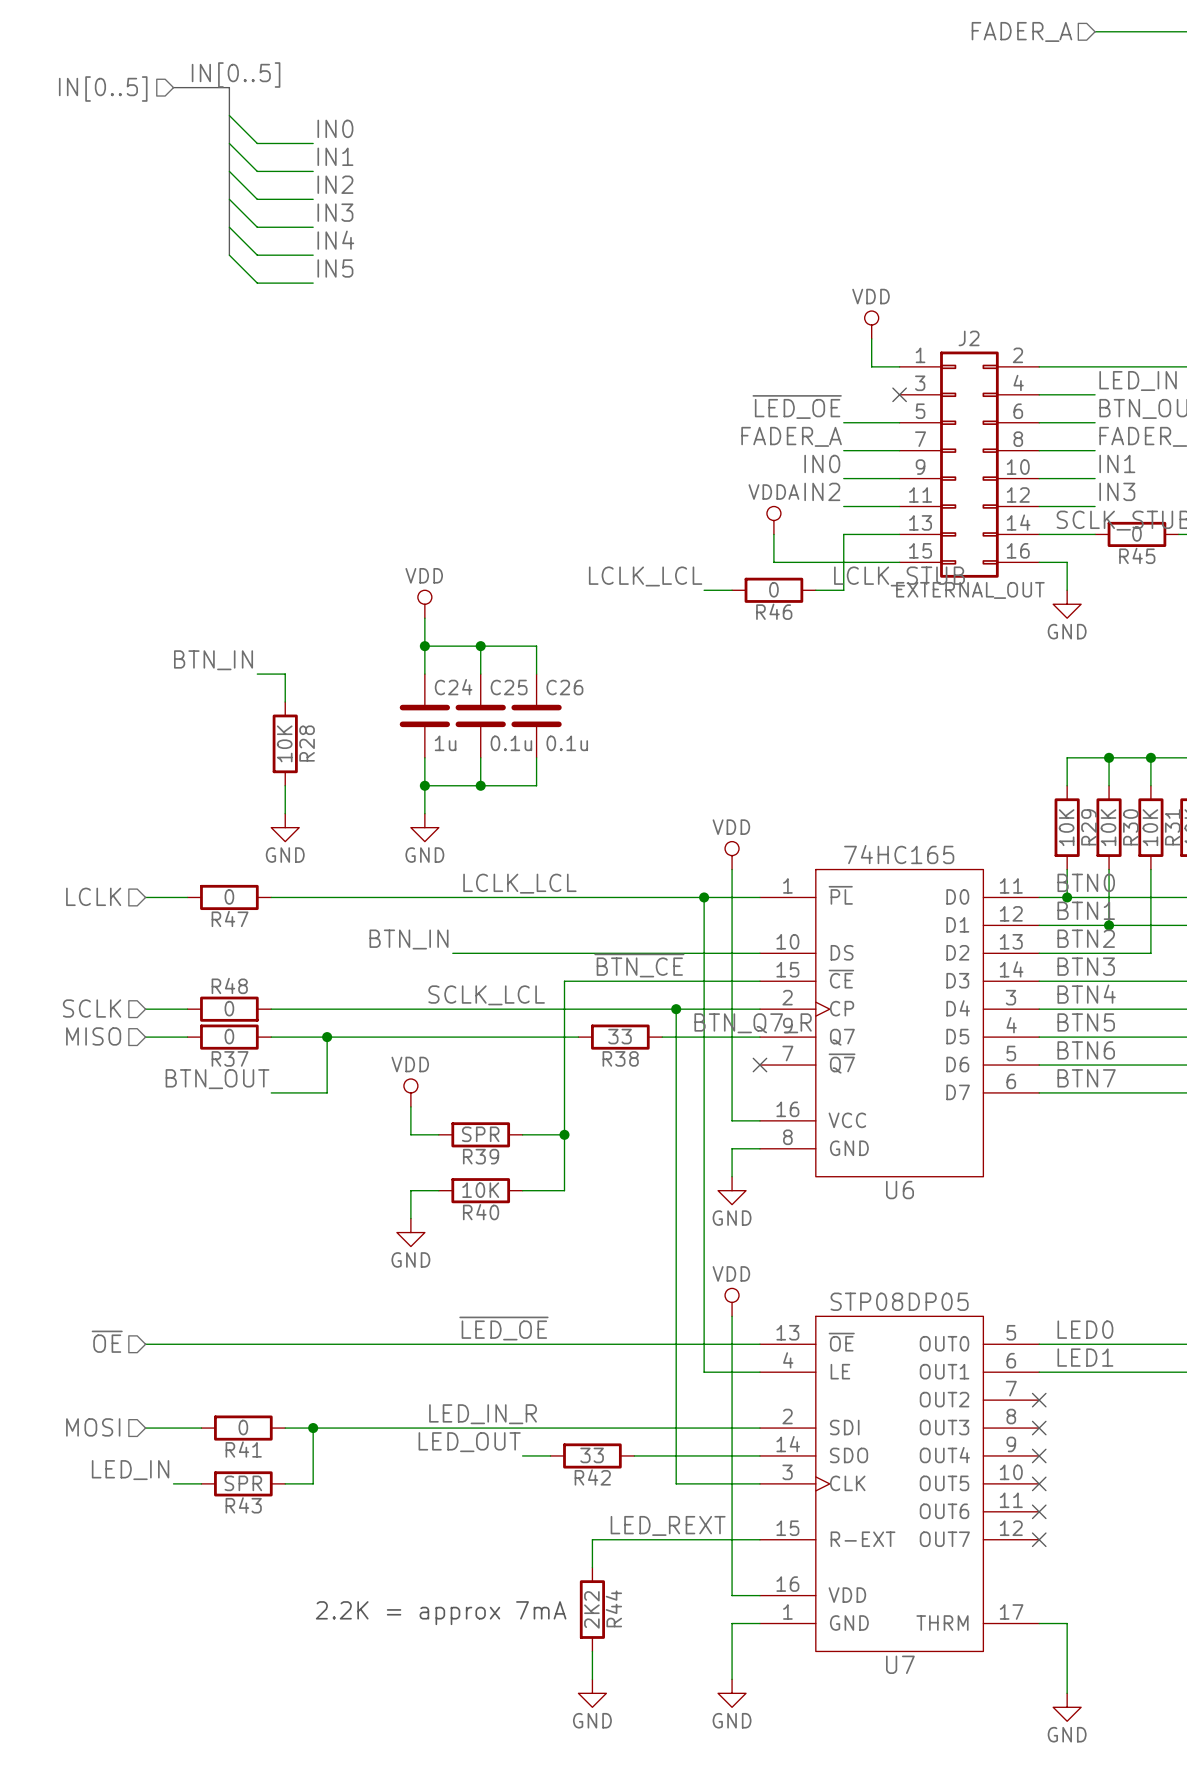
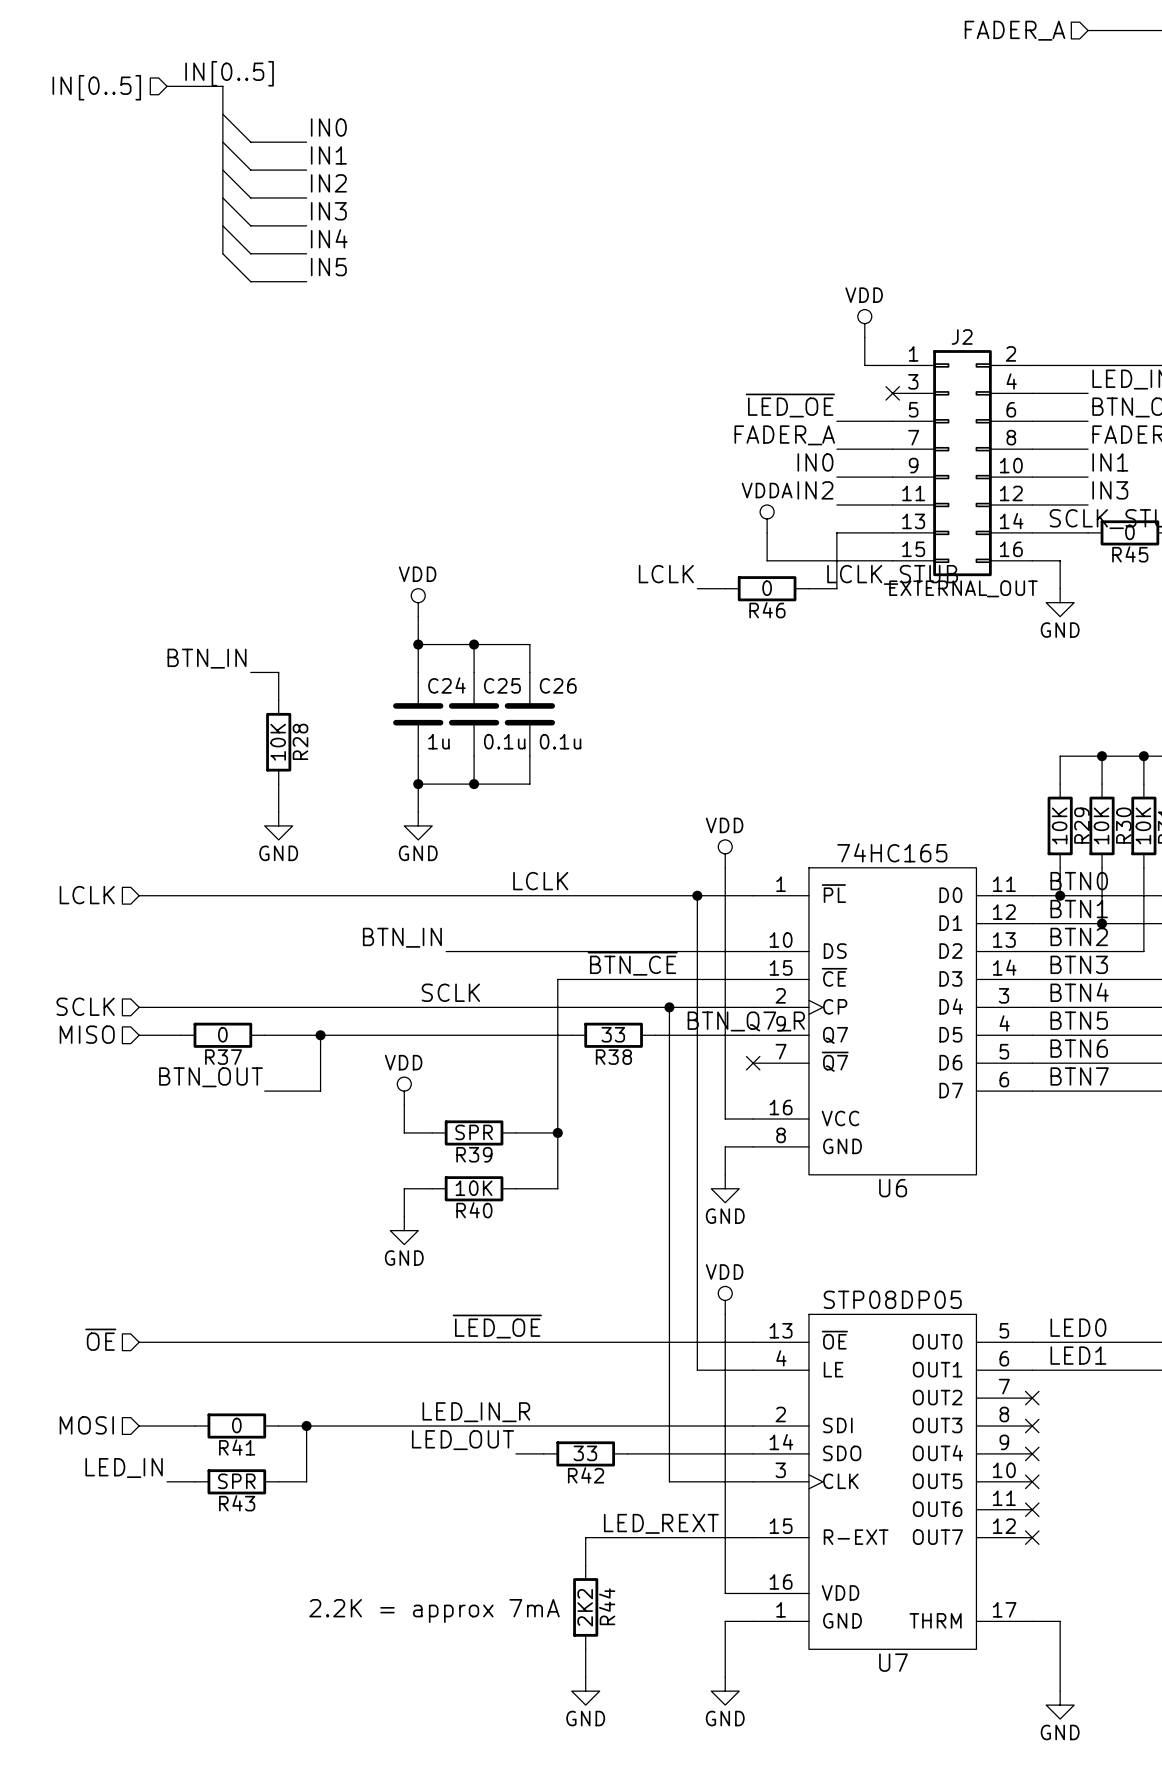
label: LCLK_LCL (645, 576) -> LCLK (666, 574)
label: LCLK_LCL (519, 883) -> LCLK (540, 881)
wire: none -> (181, 895) (264, 895)
R47: 0 (229, 897) -> none
label: SCLK_LCL (486, 995) -> SCLK (450, 992)
wire: none -> (181, 1007) (264, 1007)
R48: 0 (229, 1009) -> none

